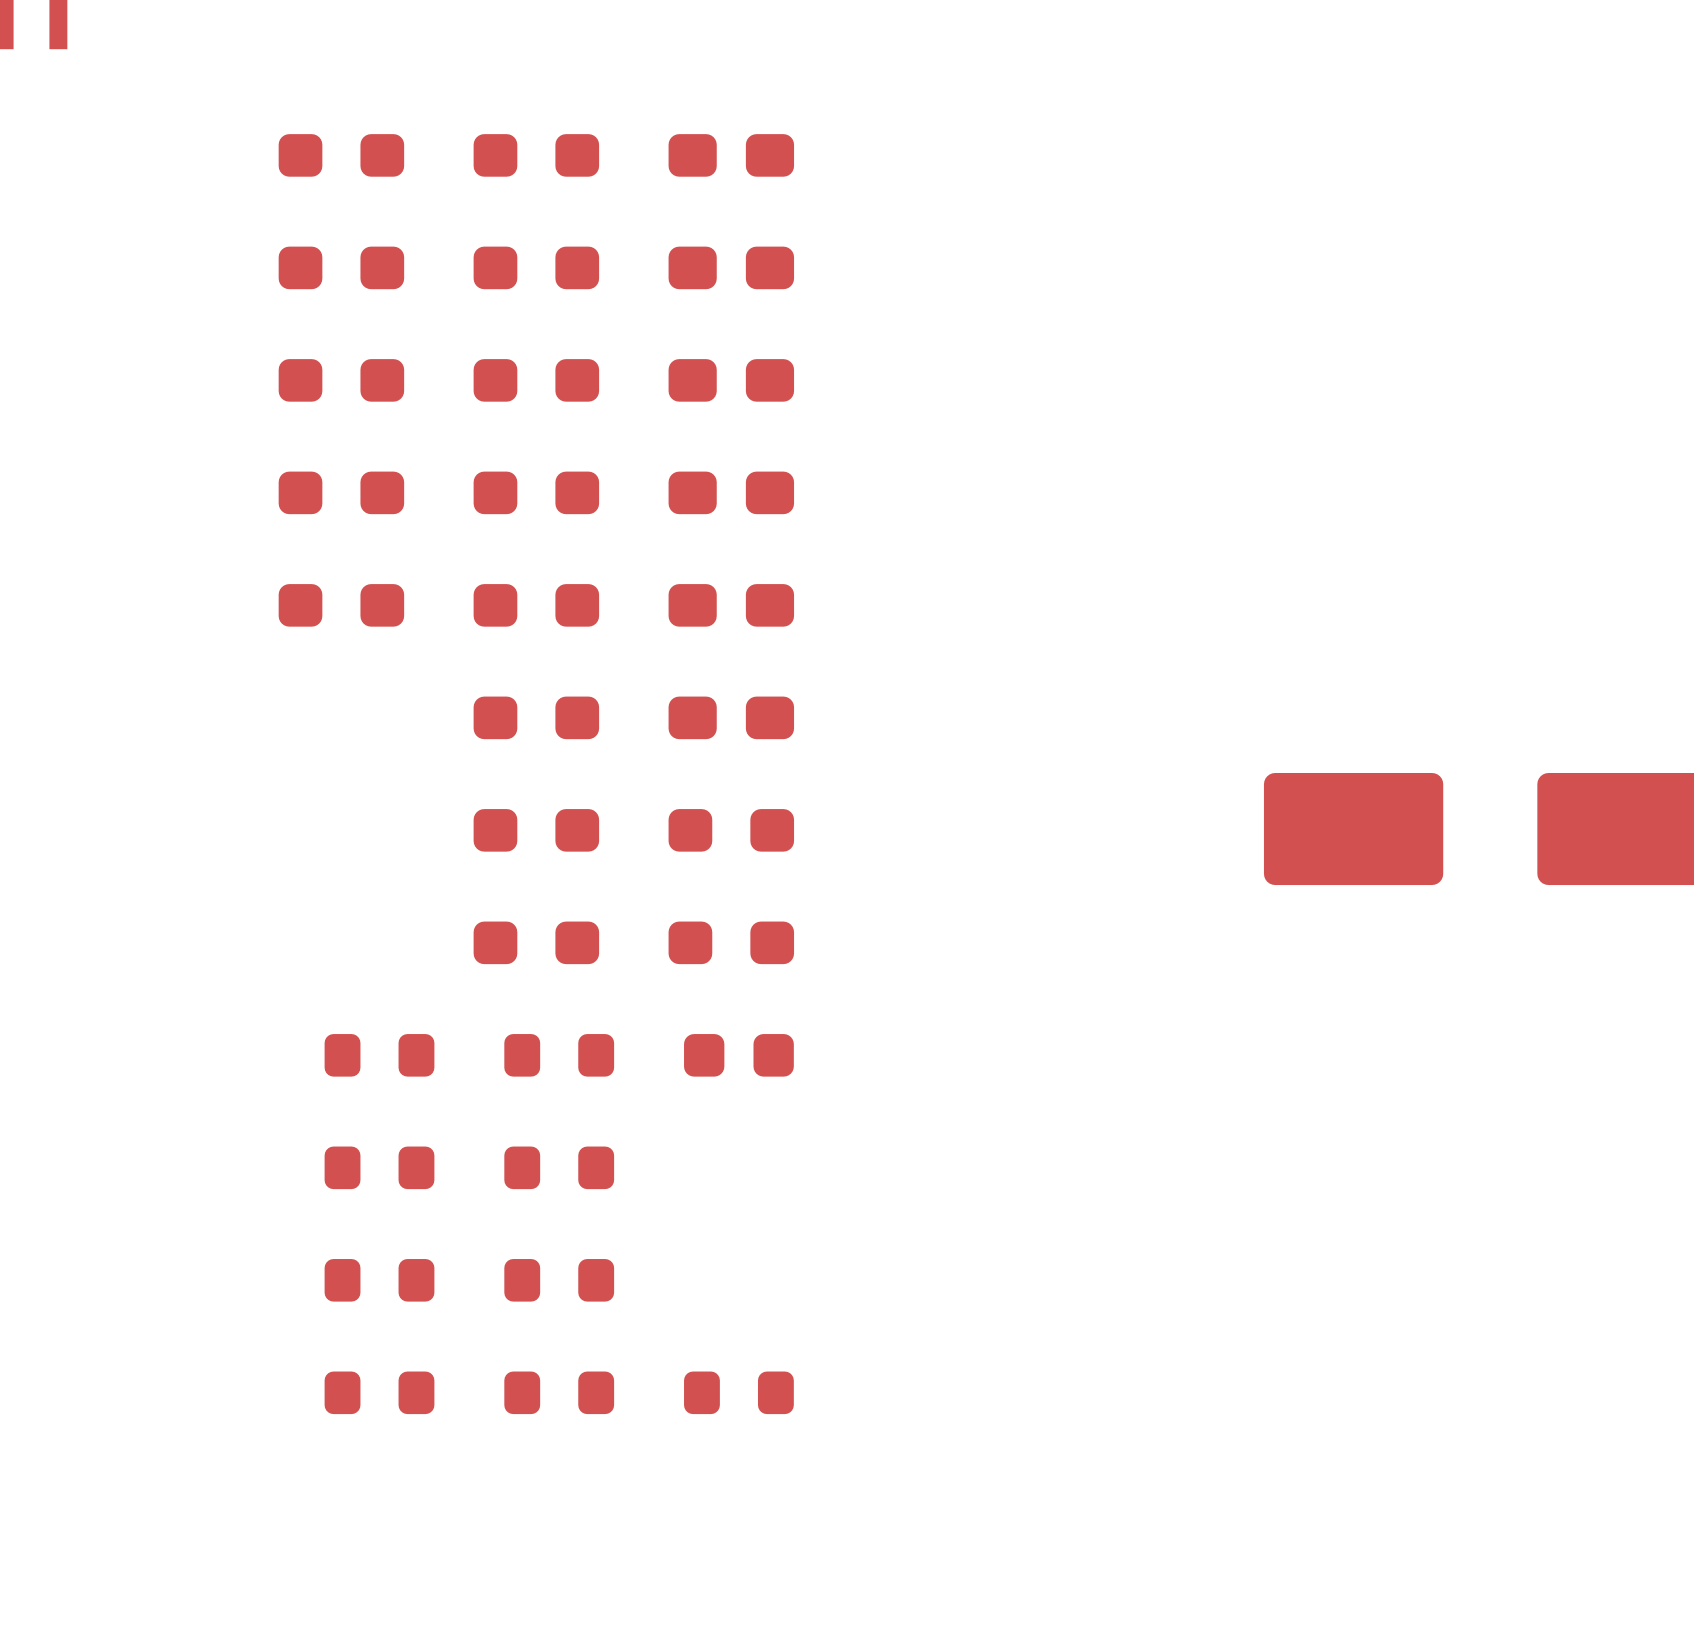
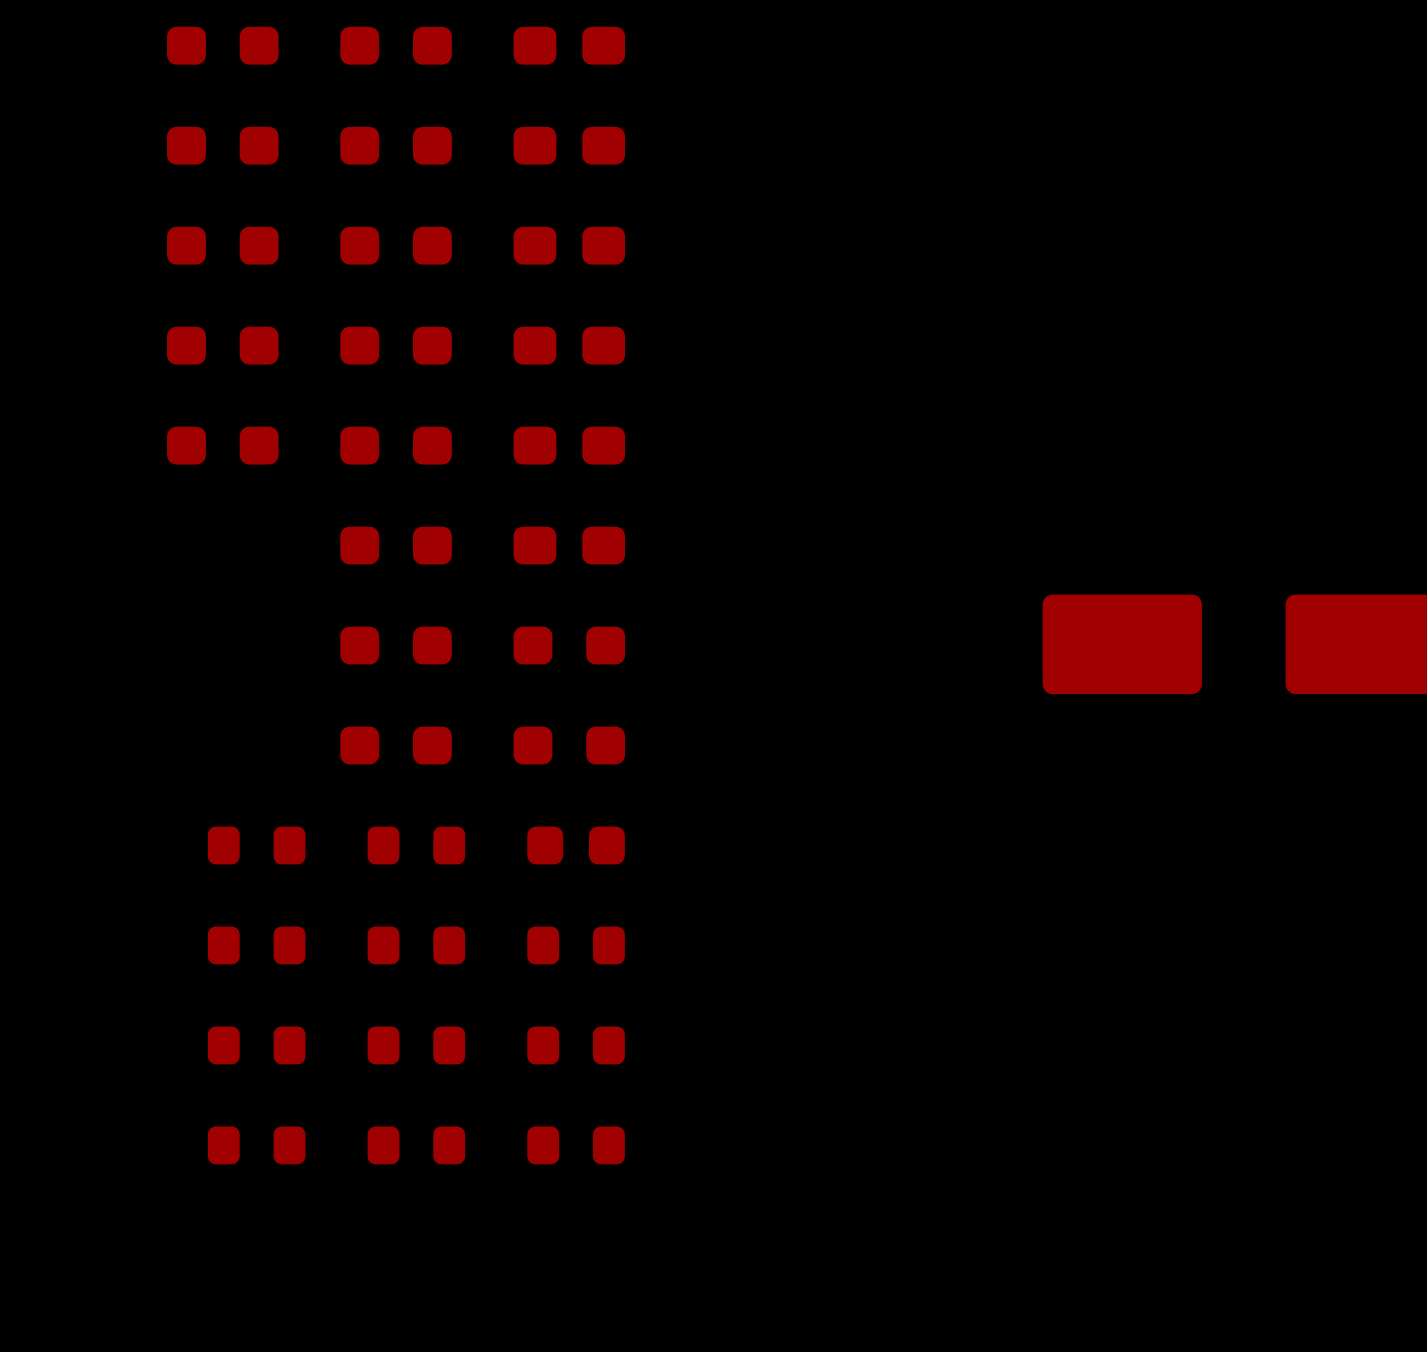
part: none -> (576, 945)
part: none -> (576, 1045)

